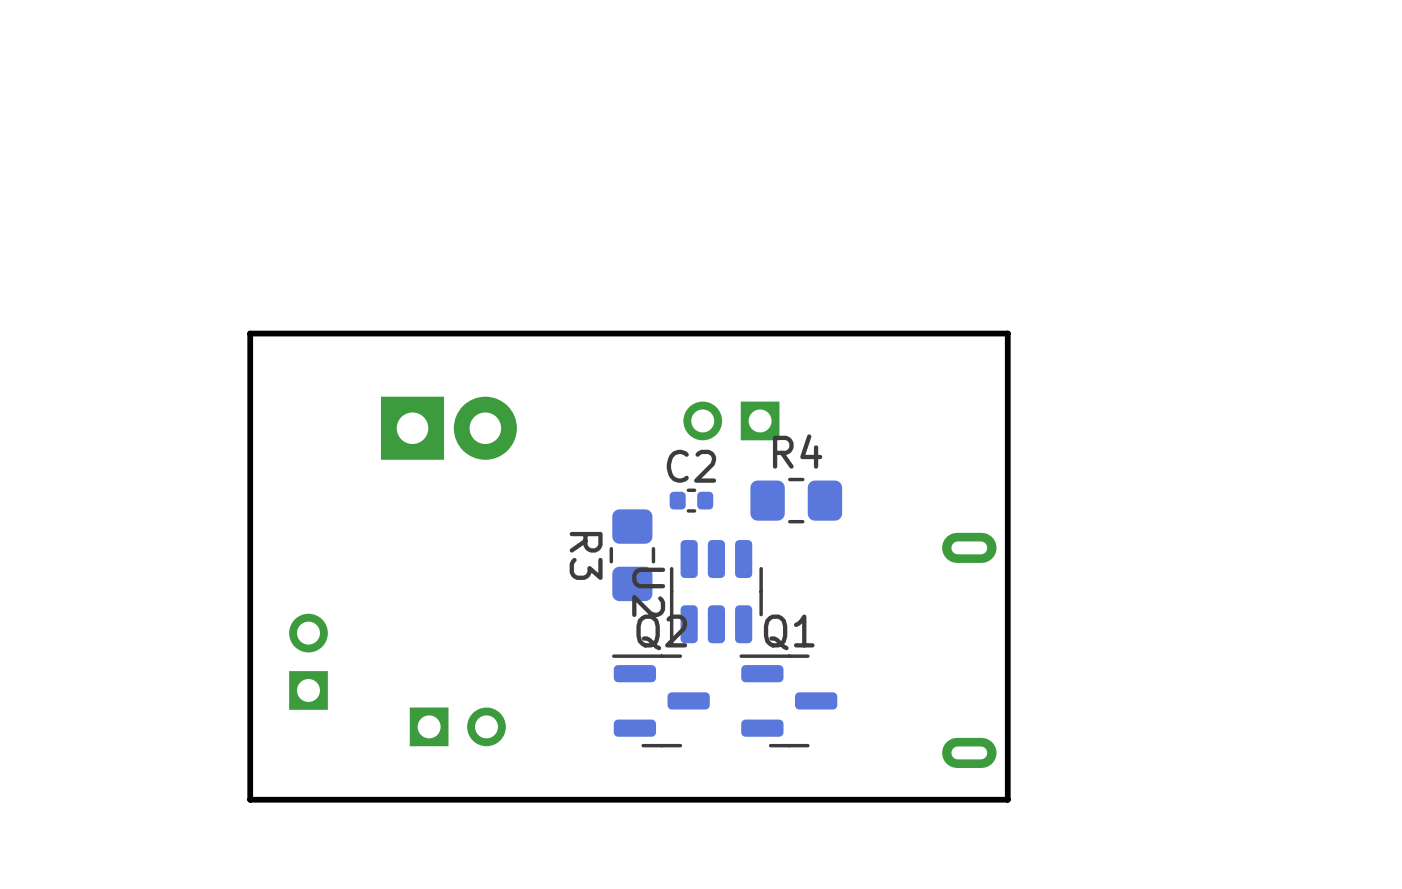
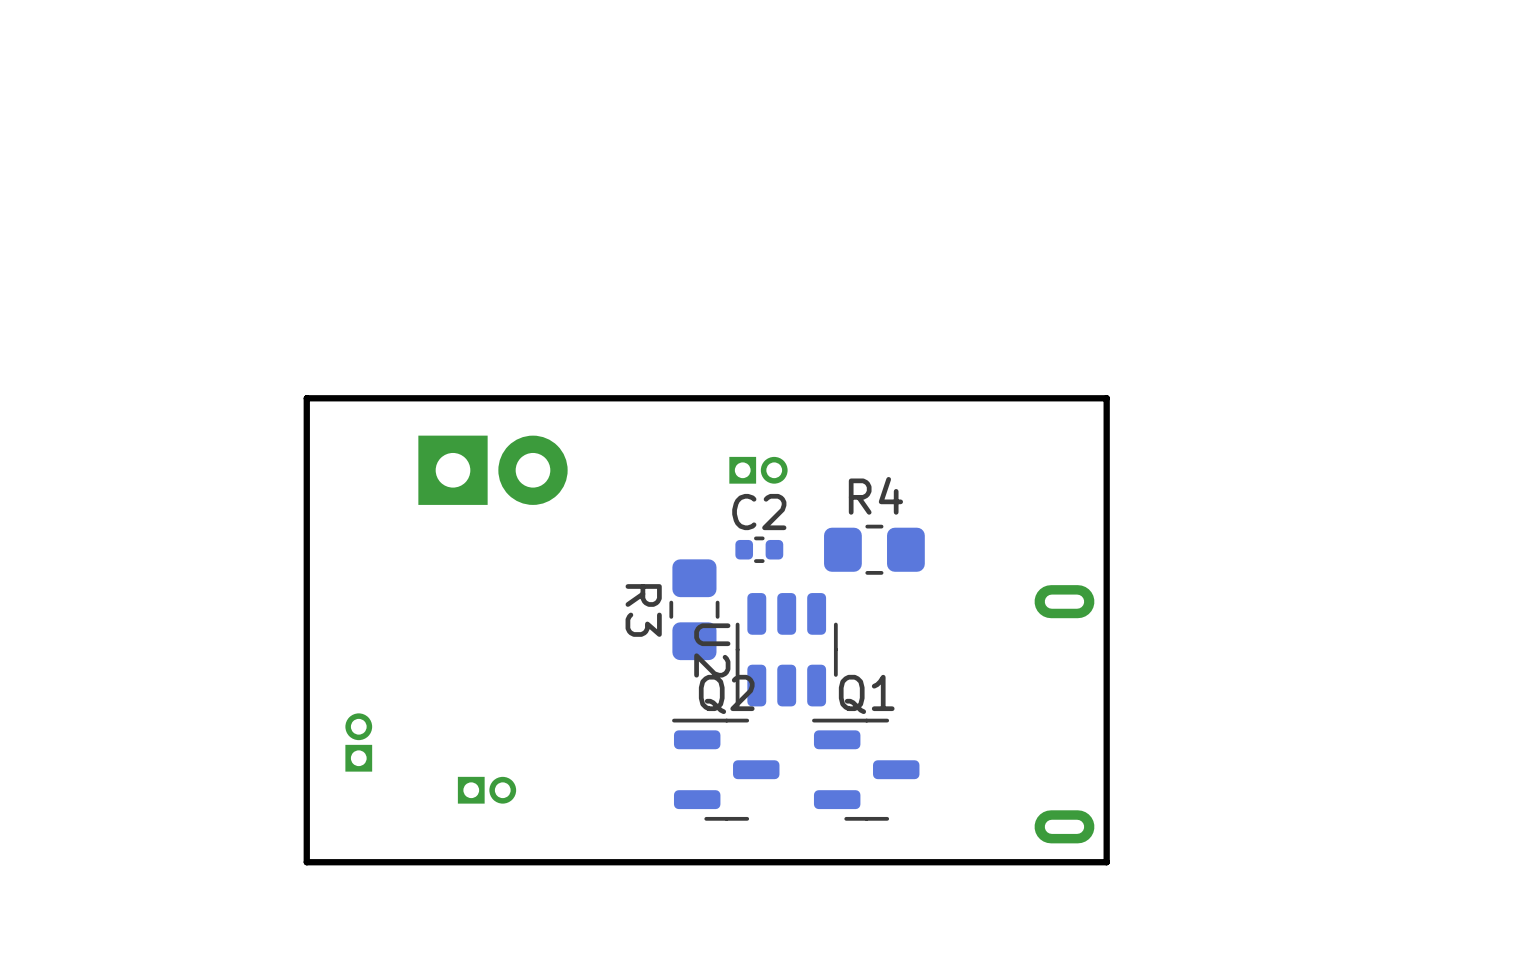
board edge: (1007, 362) (1007, 333) (250, 333) (250, 799) (1007, 799) (1007, 785) -> (1106, 398) (306, 398) (306, 862) (1106, 862)
part: (731, 420) -> none
part: none -> (758, 470)
part footprint: [289, 613, 328, 710] -> [345, 713, 373, 772]
part footprint: [409, 707, 506, 747] -> [457, 776, 517, 804]

